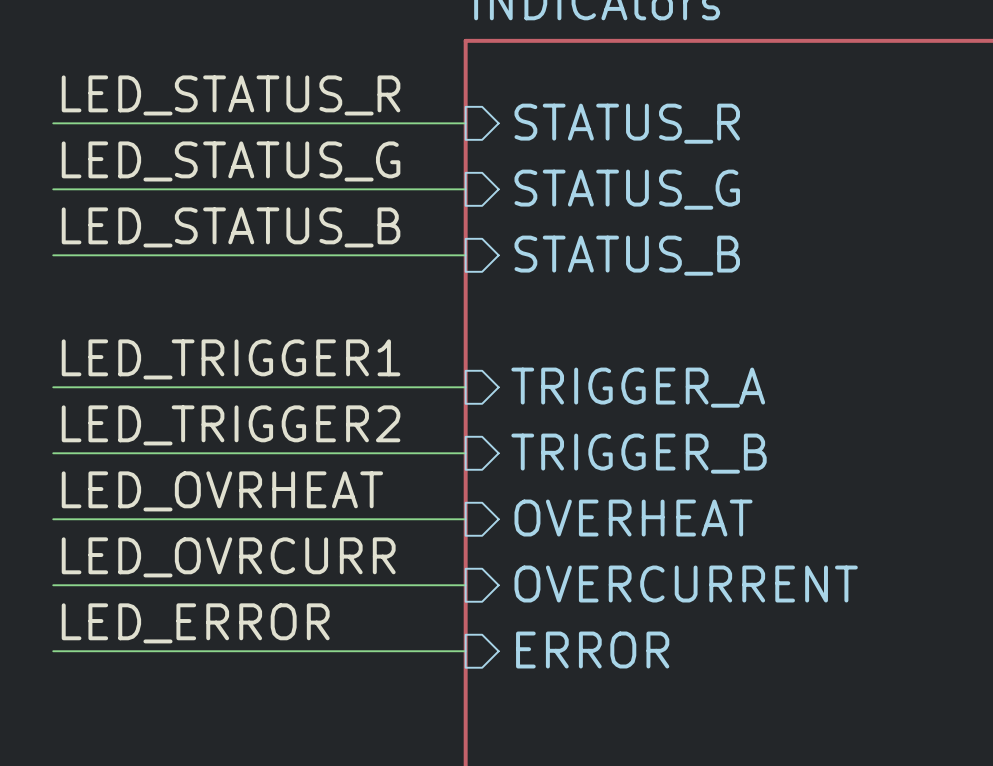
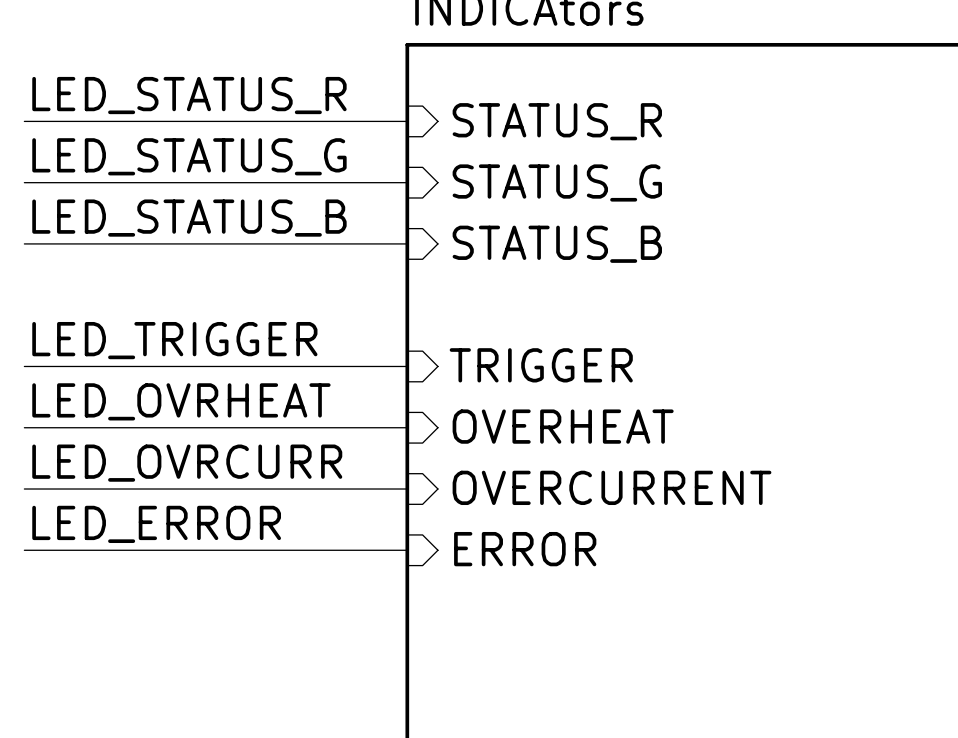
label: LED_TRIGGER1 (231, 359) -> LED_TRIGGER (174, 340)
sheet pin: TRIGGER_A (638, 387) -> TRIGGER (541, 365)
label: LED_TRIGGER2 (231, 425) -> LED_OVRHEAT (181, 401)
sheet pin: TRIGGER_B (639, 453) -> OVERHEAT (563, 426)
label: LED_OVRHEAT (222, 491) -> LED_OVRCURR (187, 463)
sheet pin: OVERHEAT (633, 518) -> OVERCURRENT (612, 487)
label: LED_OVRCURR (228, 557) -> LED_ERROR (156, 524)
sheet pin: OVERCURRENT (686, 584) -> ERROR (525, 549)
label: LED_ERROR (195, 623) -> none
sheet pin: ERROR (592, 650) -> none
wire: (53, 651) (465, 651) -> none

